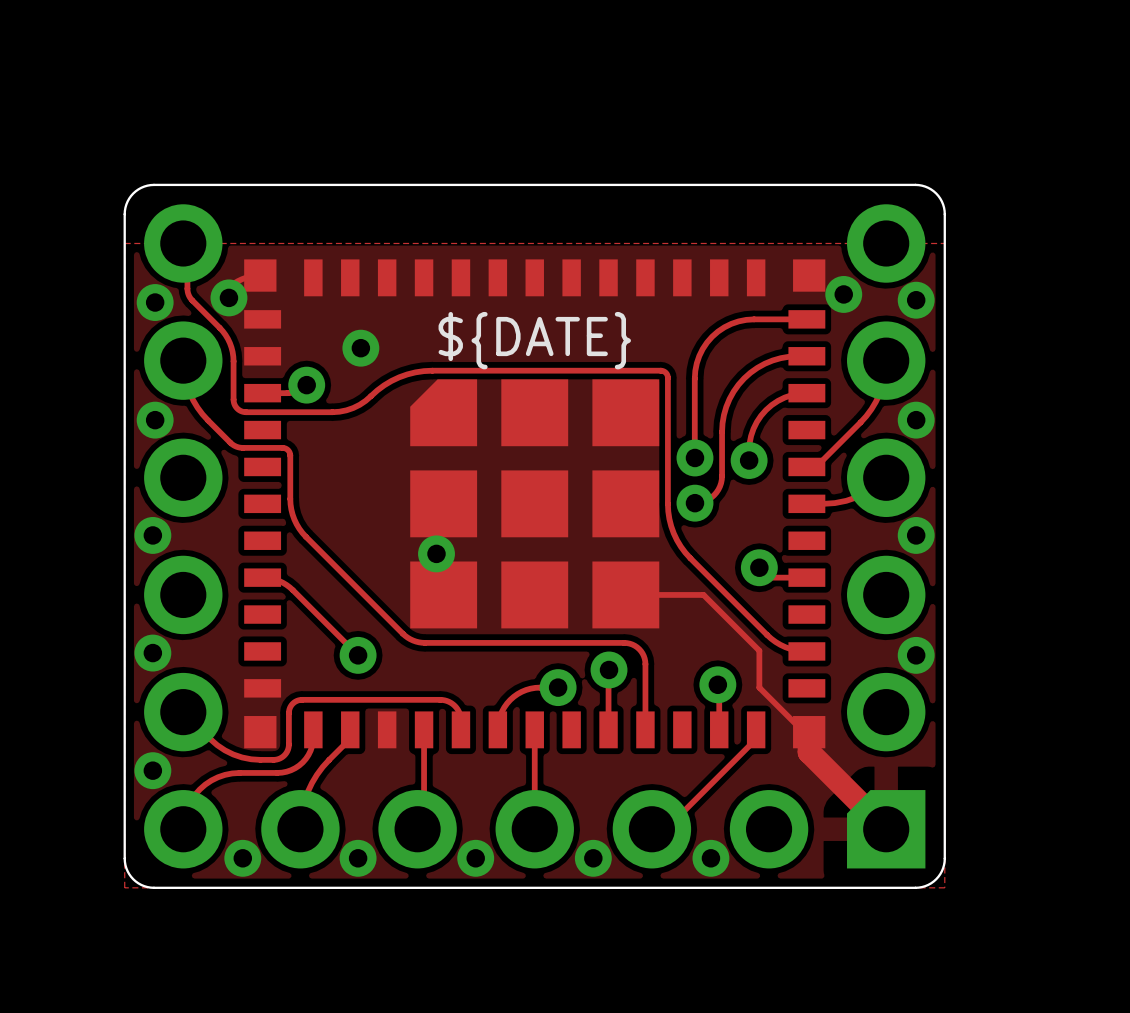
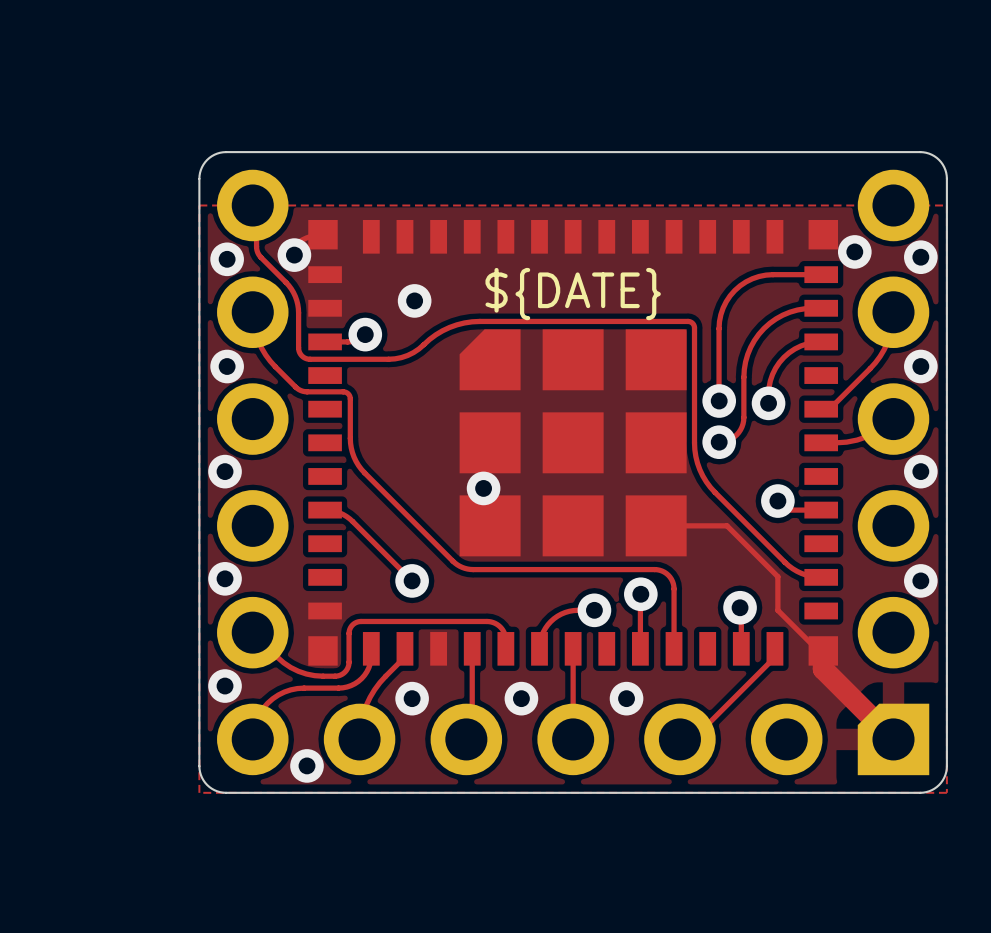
via: none -> (412, 698)
via: none -> (521, 698)
via: none -> (626, 698)
via: (358, 858) -> none
via: (475, 858) -> none
via: (593, 858) -> none
via: (710, 858) -> none

